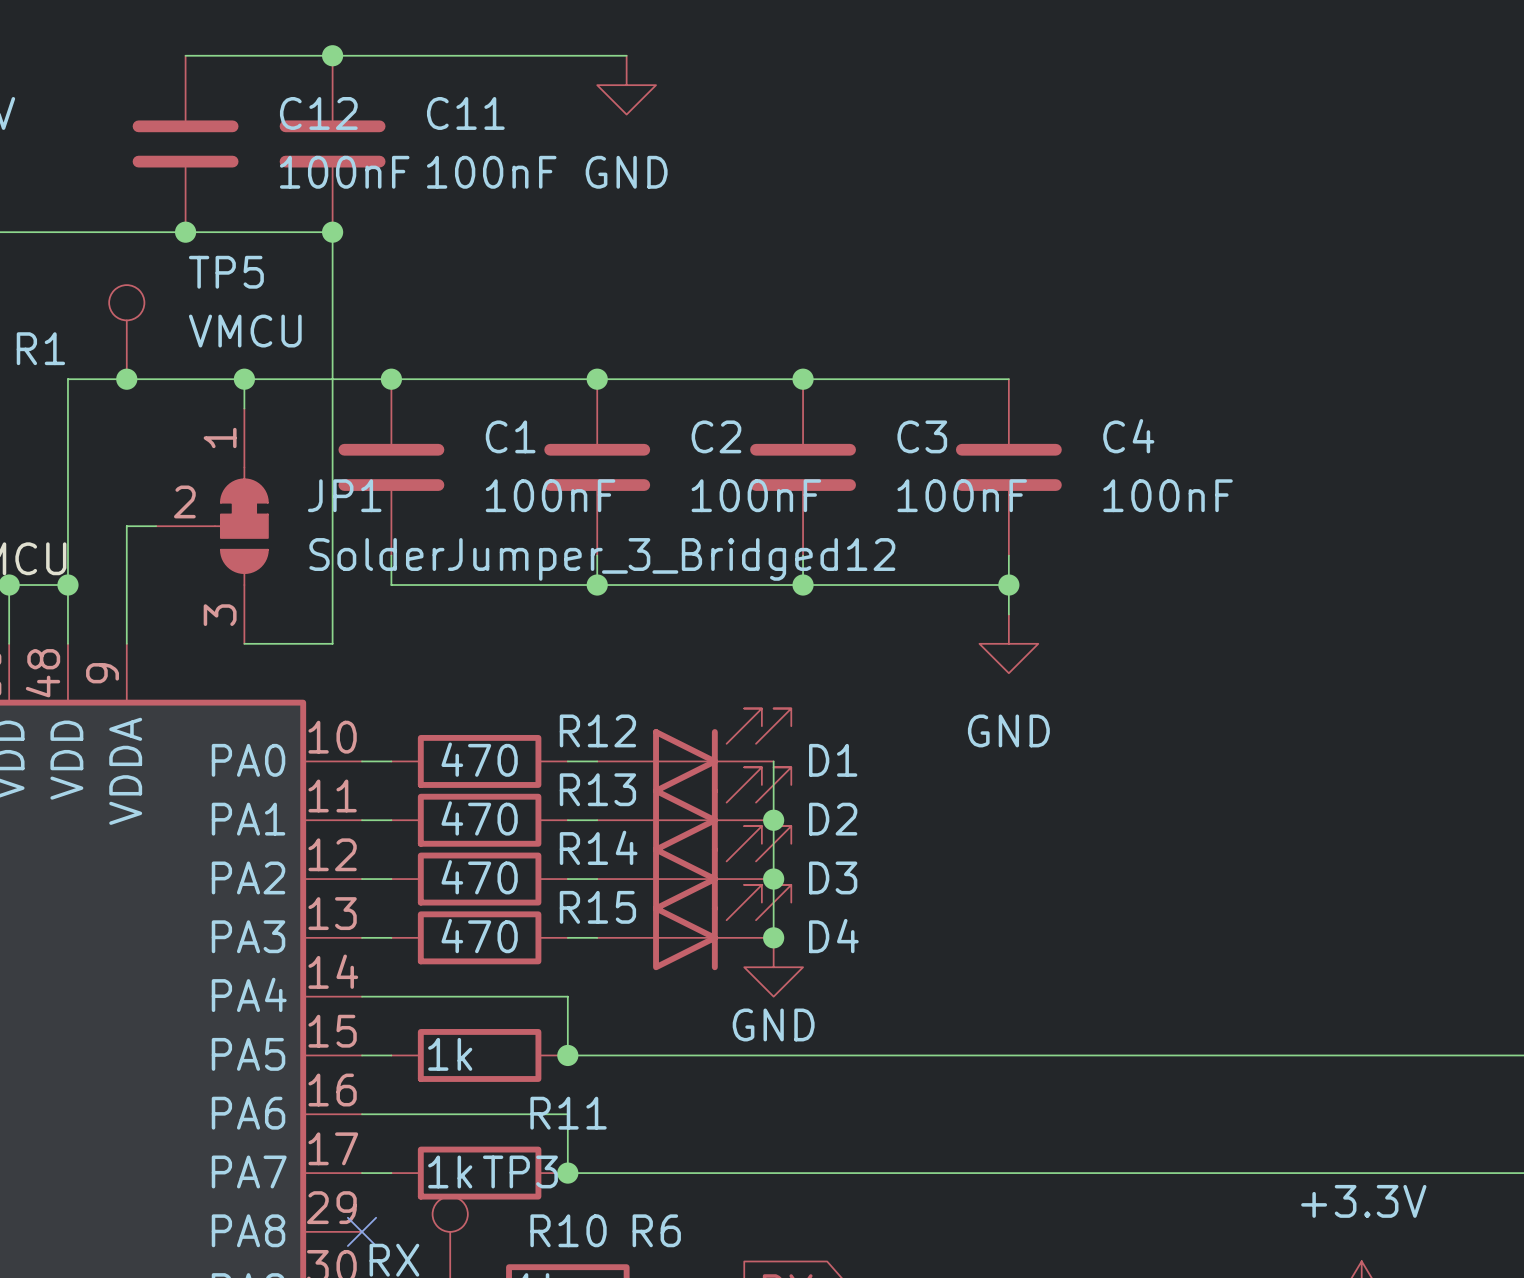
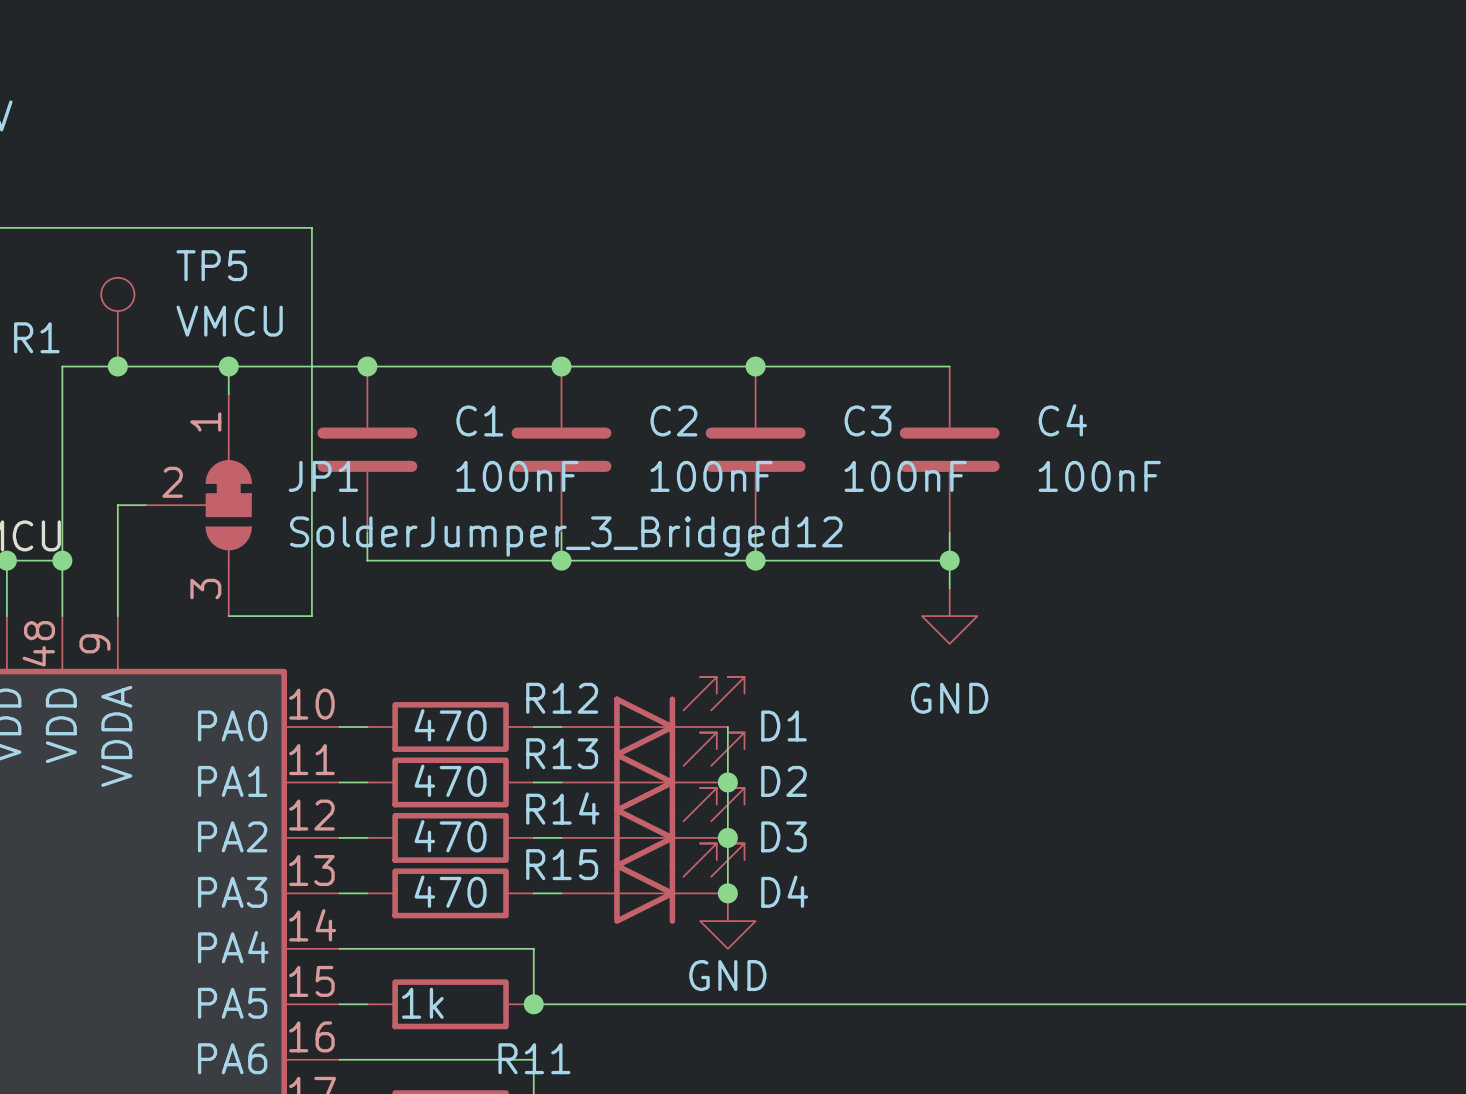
wire: (185, 55) (626, 55) -> none
junction: (332, 55) -> none
power symbol: GND (626, 85) -> none
C12: 100nF (185, 143) -> none
C11: 100nF (332, 143) -> none
junction: (185, 232) -> none
junction: (332, 232) -> none

